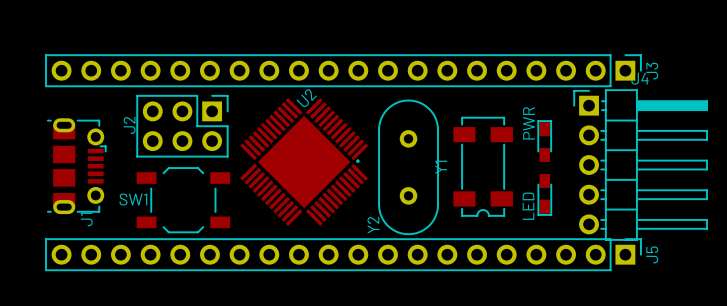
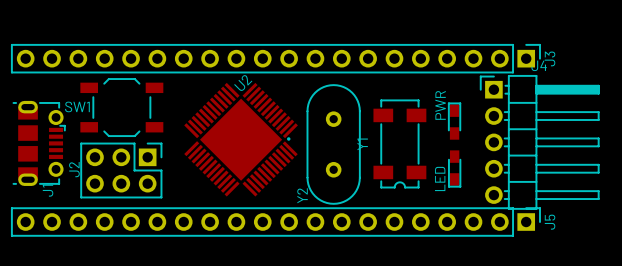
J2 position: (182, 126) -> (121, 170)
SW1 position: (183, 200) -> (121, 107)

